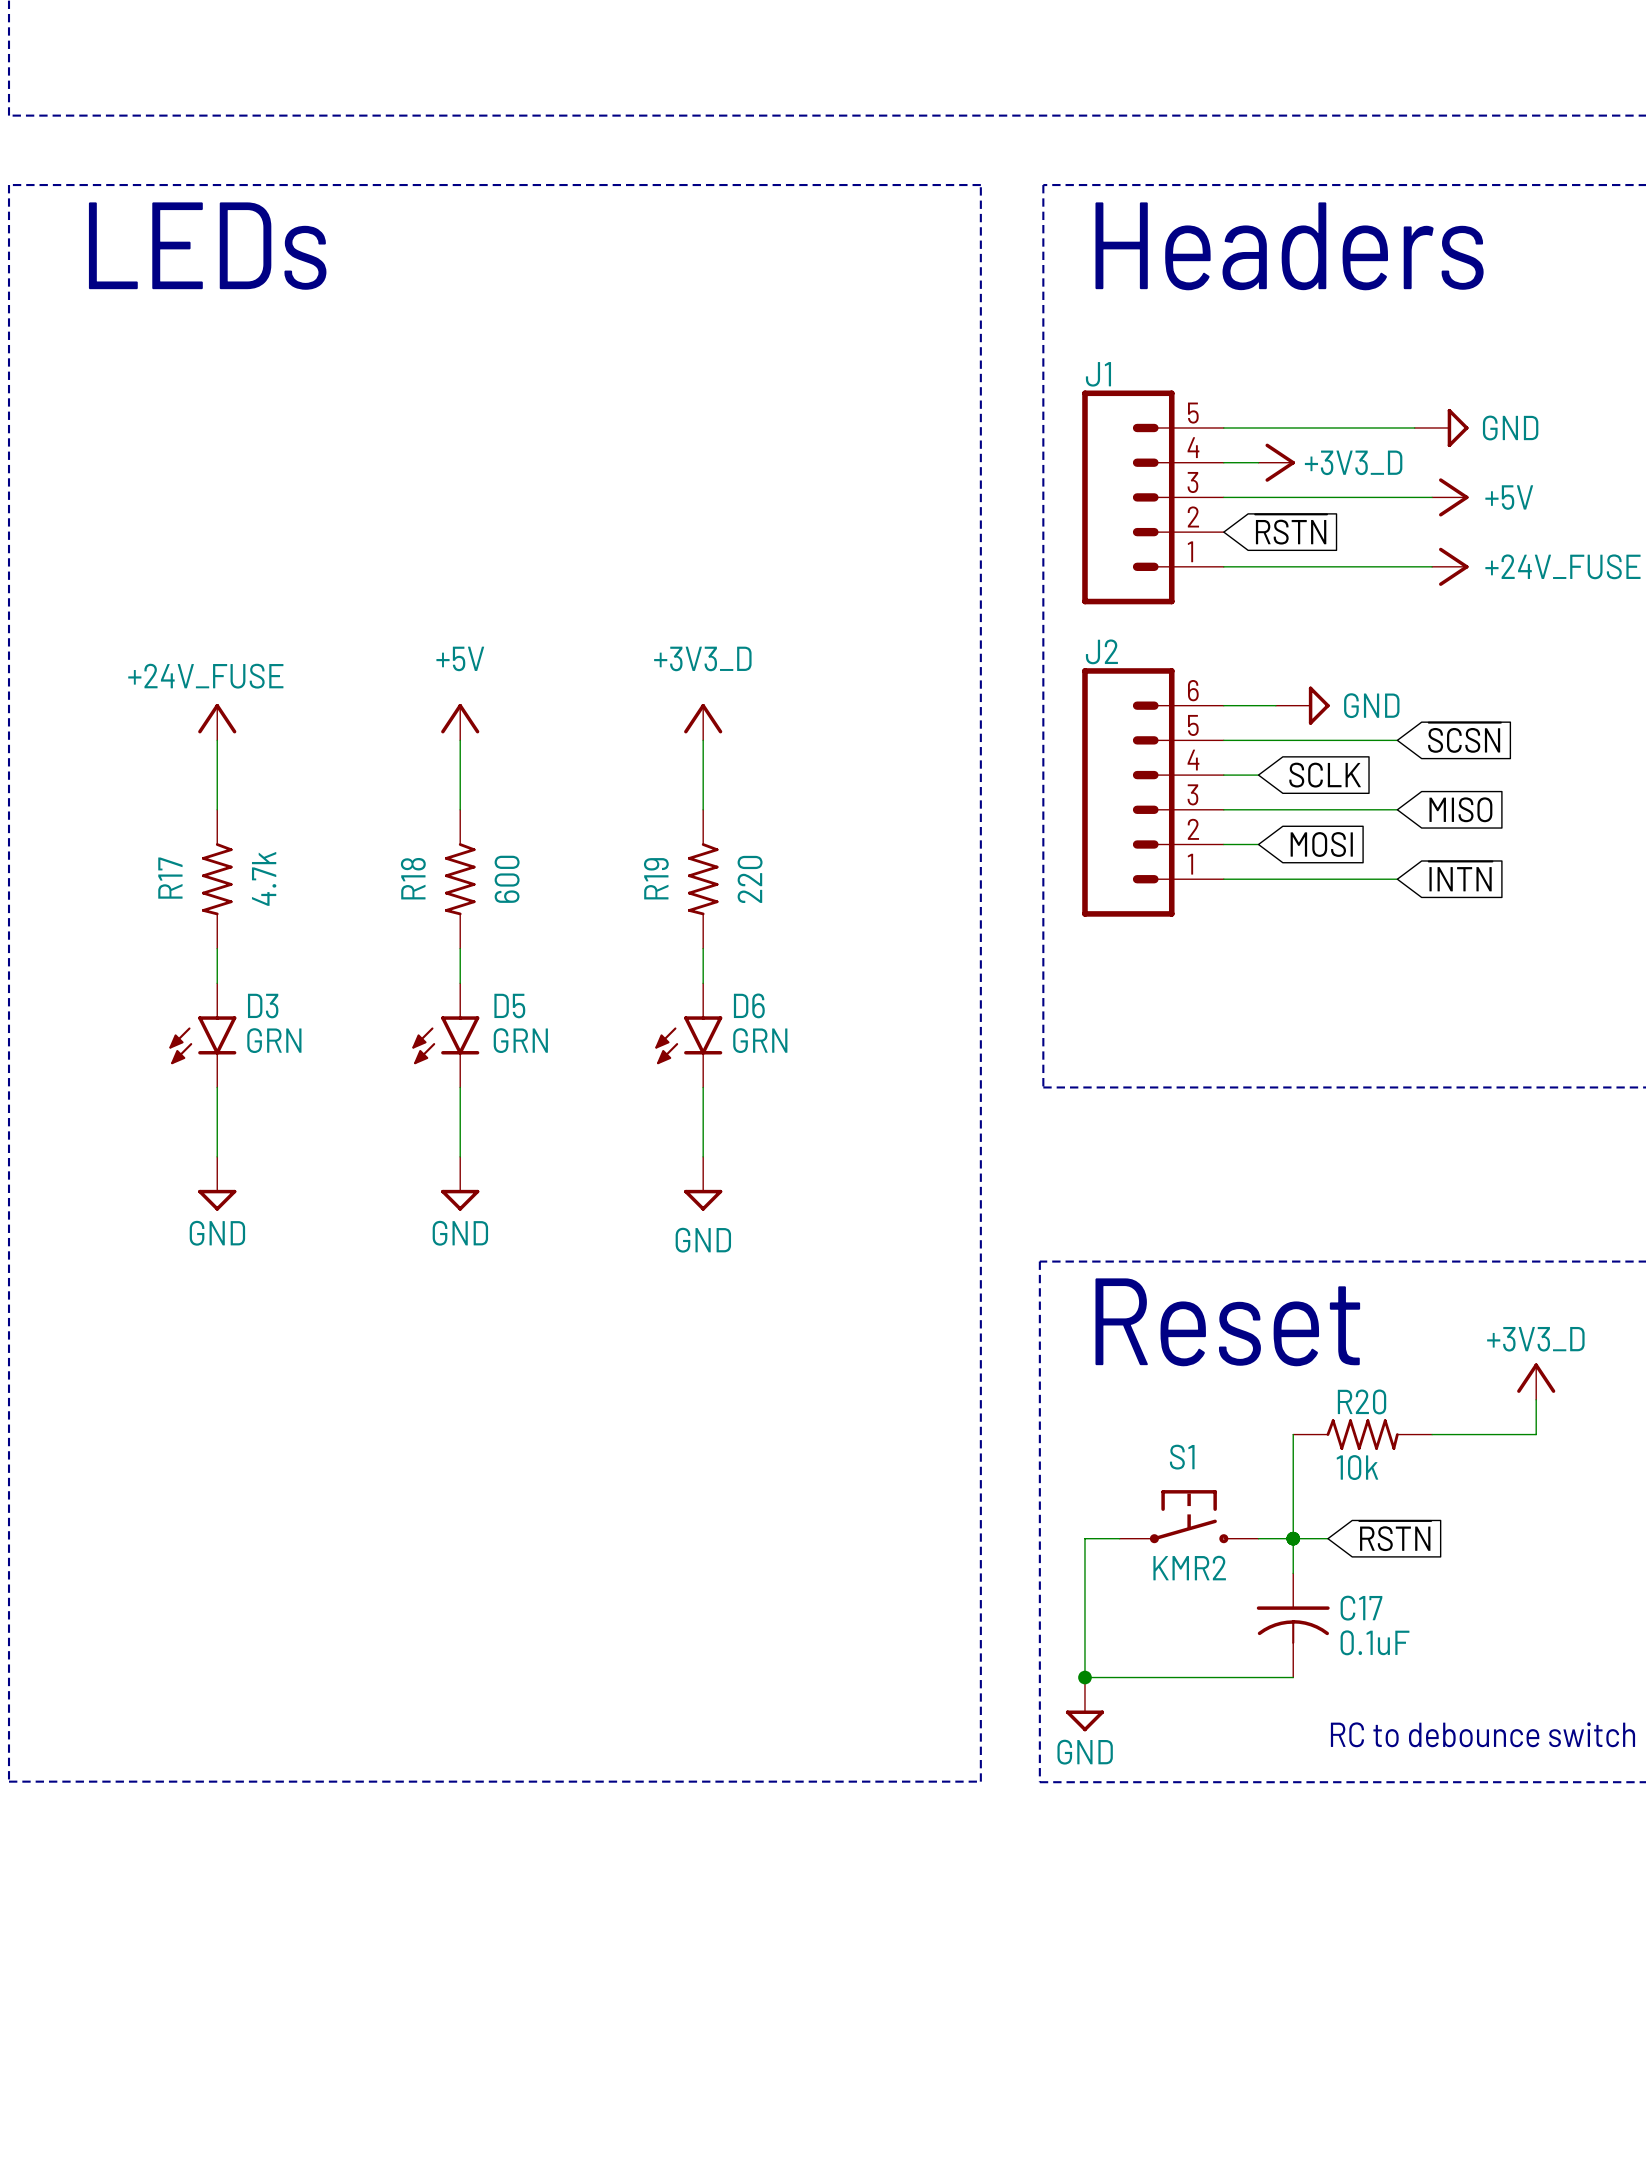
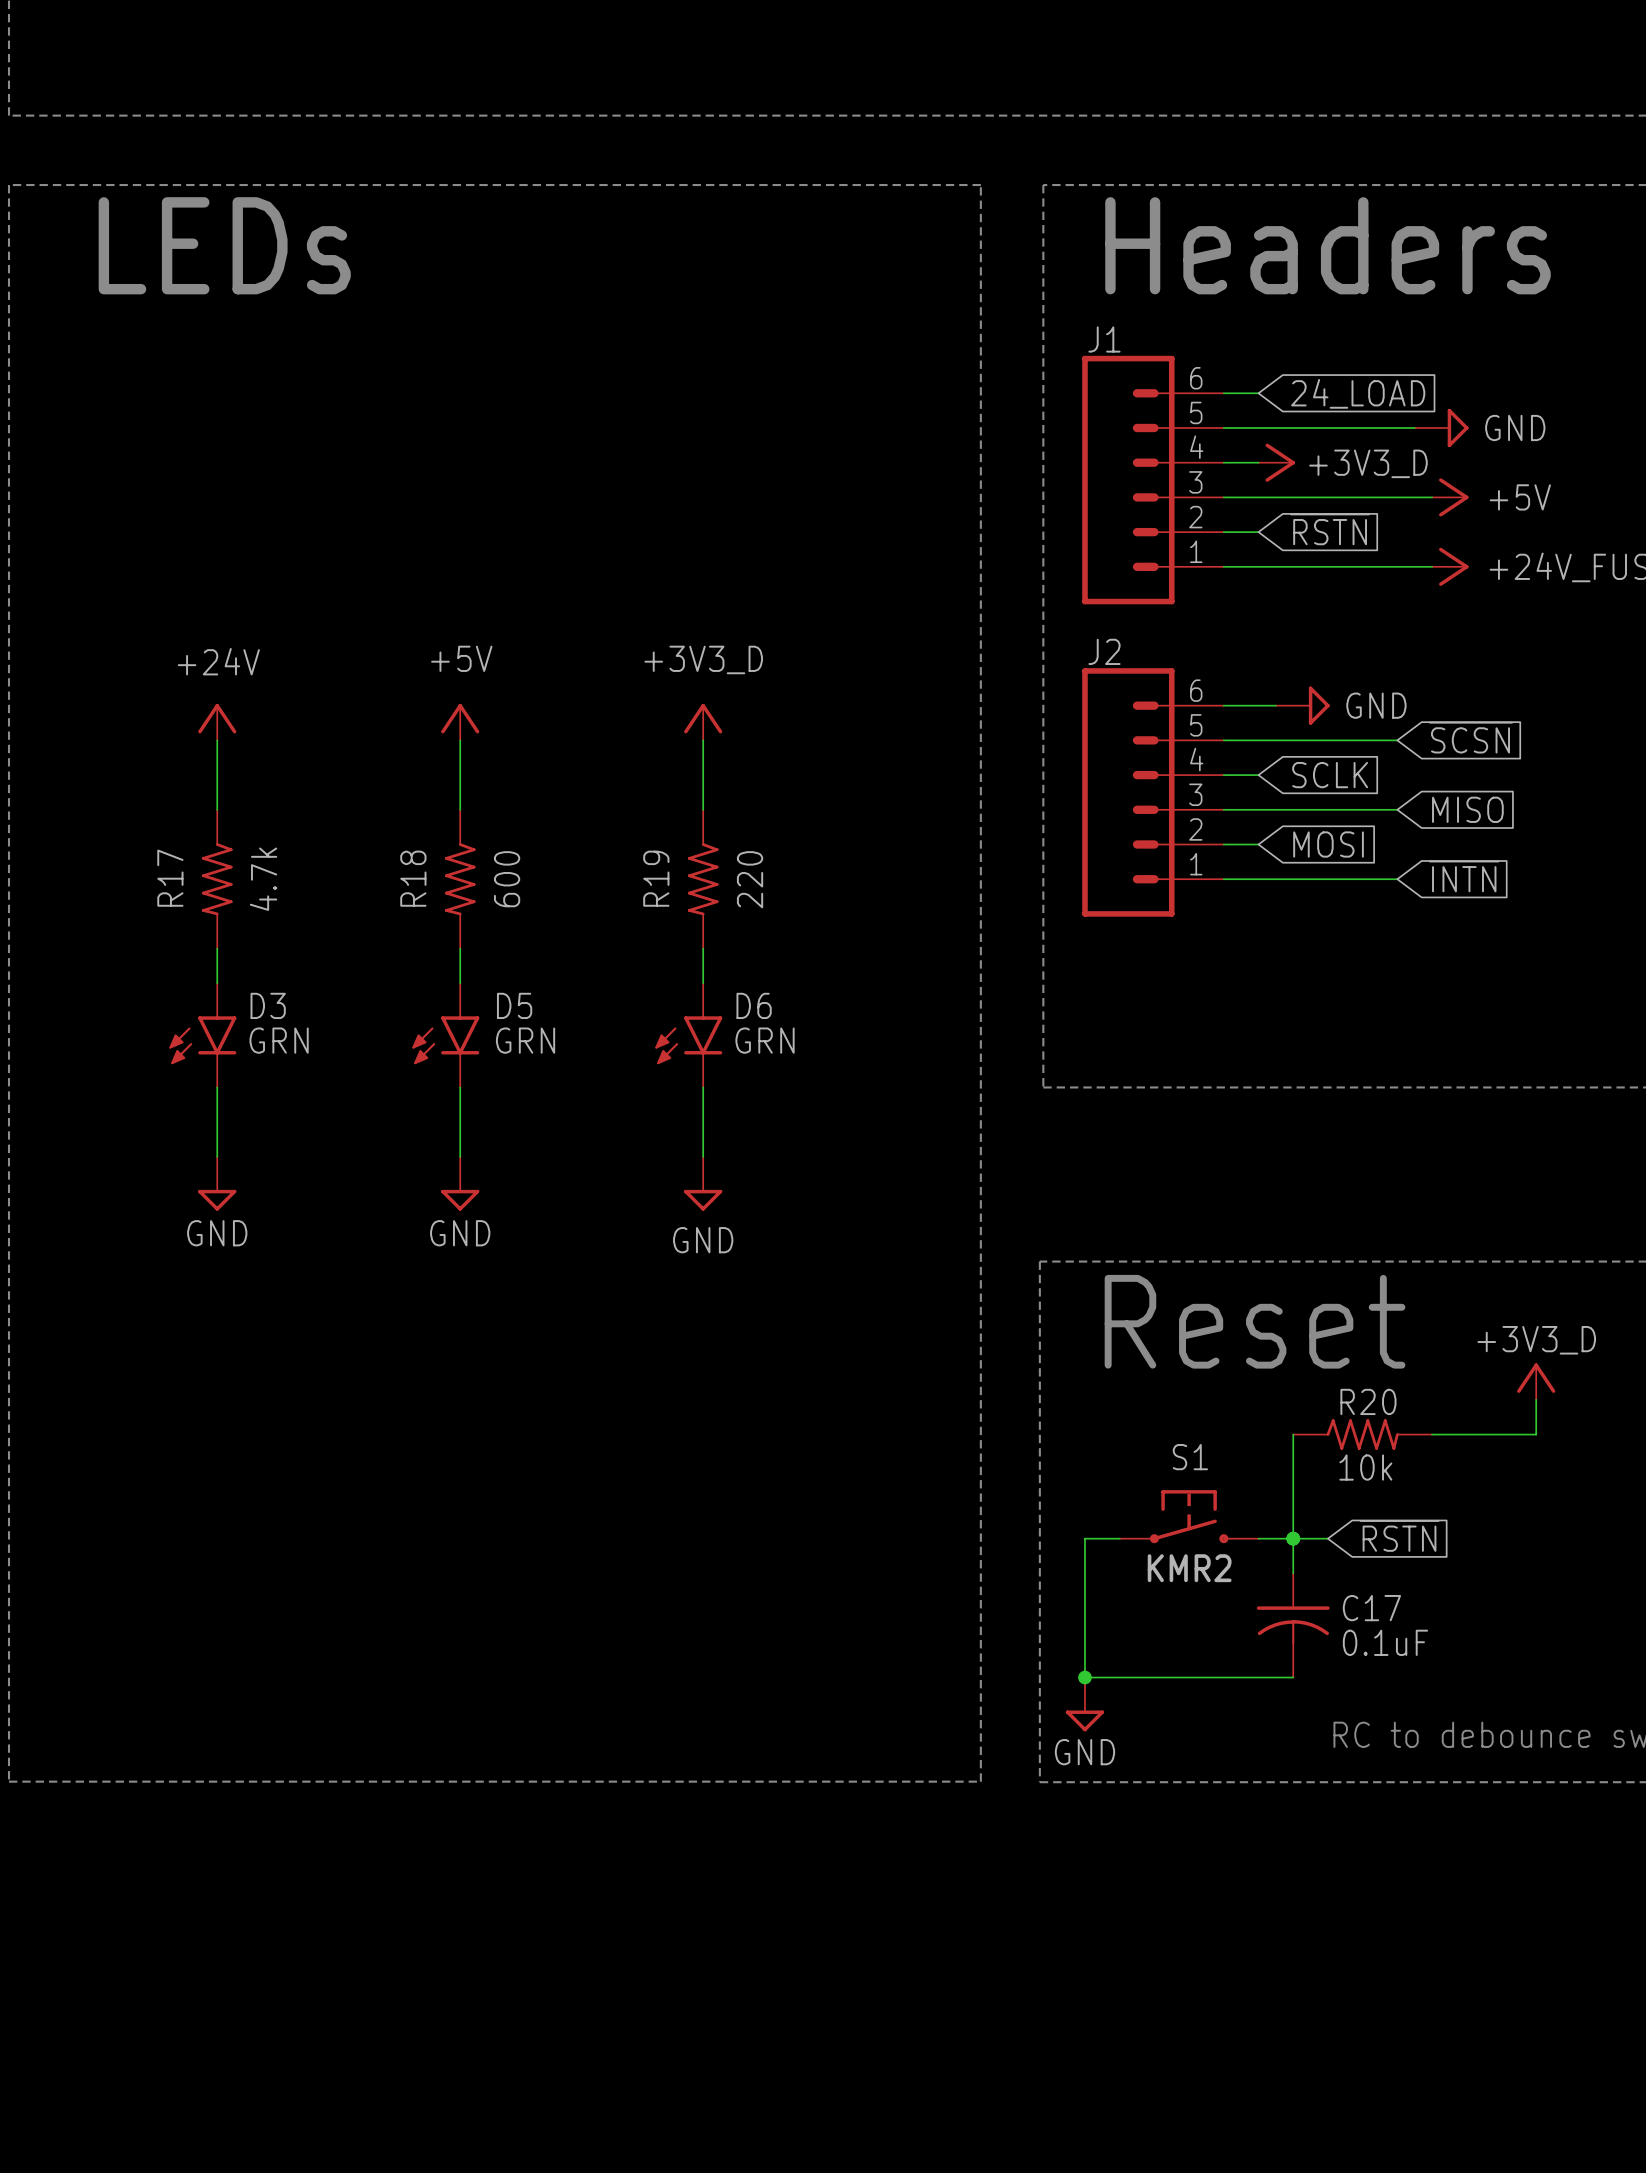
J1 symbol: [1082, 390, 1224, 605] -> [1082, 355, 1224, 605]
wire: none -> (1223, 393) (1258, 393)
global label: none -> 24_LOAD (1358, 393)
global label position: ~{RSTN} (1291, 529) -> ~{RSTN} (1330, 529)
wire: none -> (1223, 532) (1258, 532)
power symbol: +24V_FUSE (217, 722) -> +24V (217, 722)

